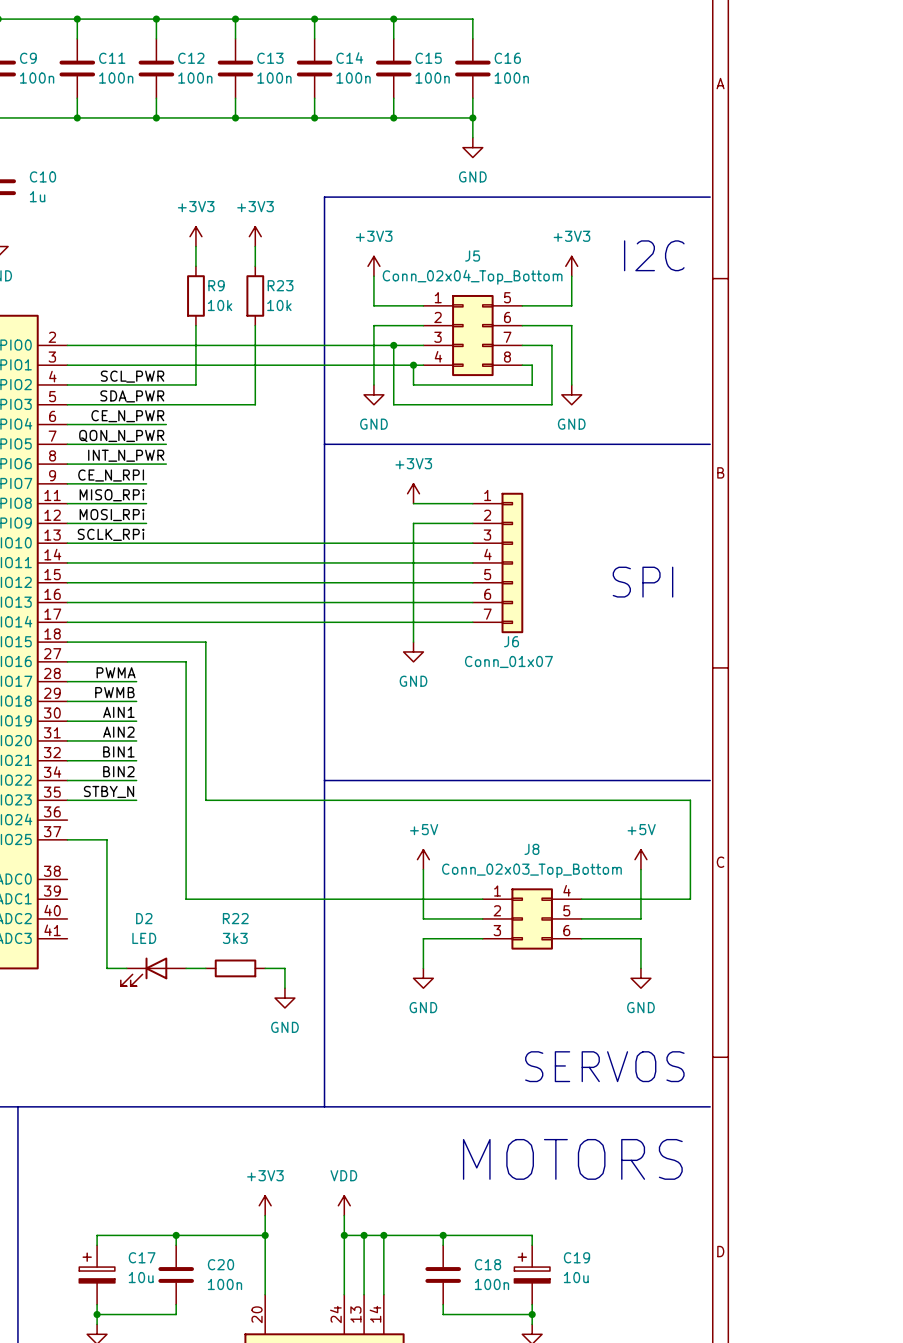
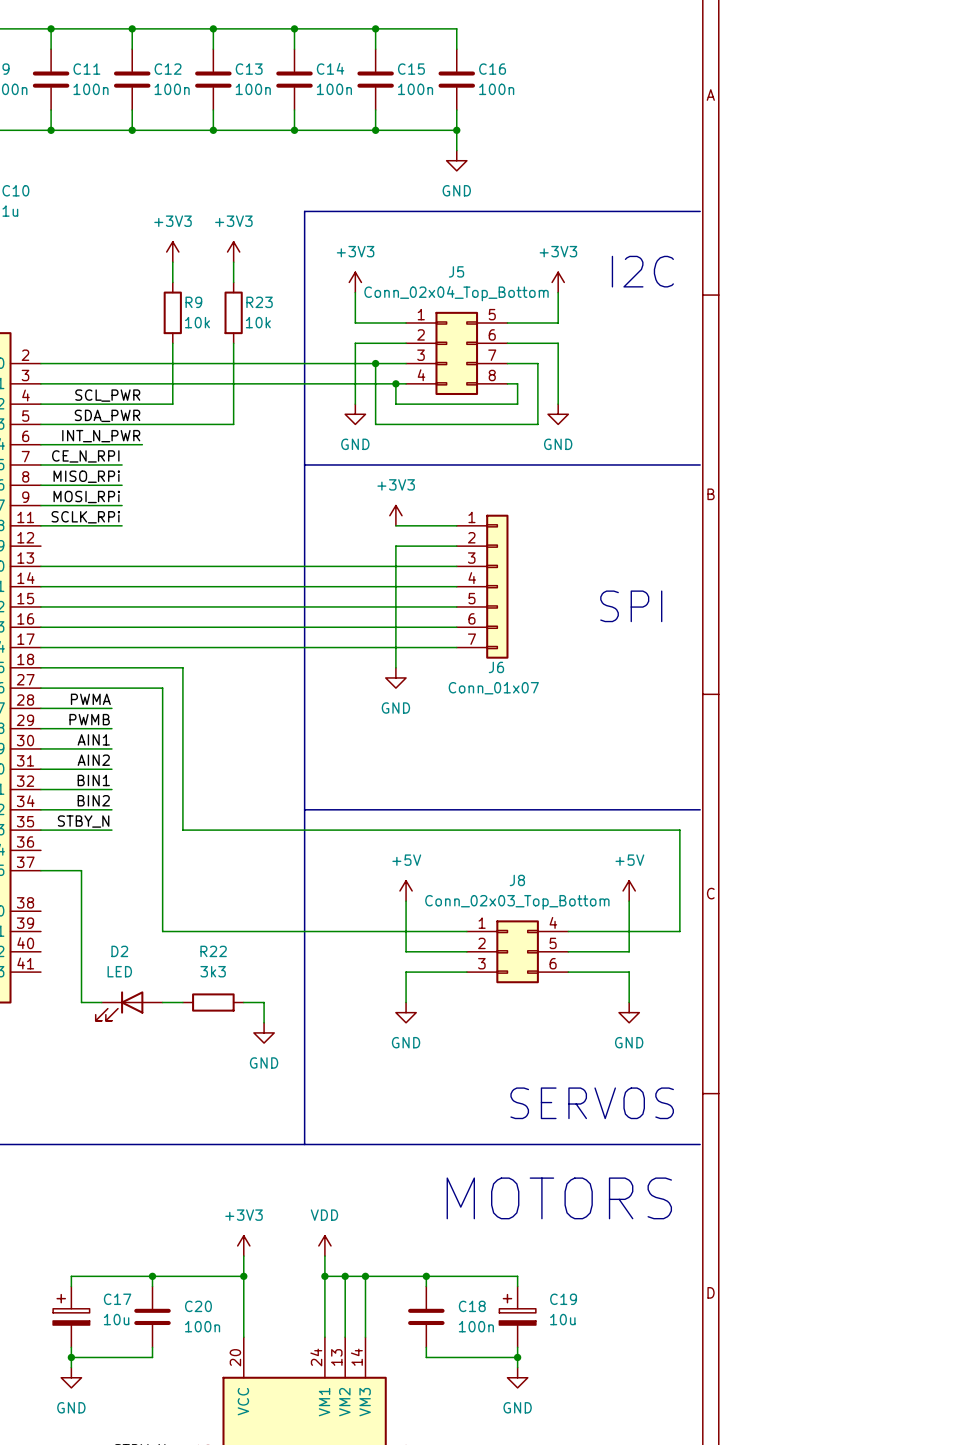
label: CE_N_PWR (127, 416) -> INT_N_PWR (101, 436)
label: none -> CE_N_RPI (85, 456)
label: QON_N_PWR (121, 435) -> none
wire: (146, 444) (166, 444) -> none
label: none -> MISO_RPi (86, 476)
label: INT_N_PWR (126, 455) -> none
wire: (146, 464) (166, 464) -> none
label: CE_N_RPI (111, 475) -> MOSI_RPi (86, 496)
label: MISO_RPi (112, 495) -> SCLK_RPi (85, 517)
label: MOSI_RPi (112, 515) -> none
wire: (67, 523) (146, 523) -> none
label: SCLK_RPi (111, 534) -> none

